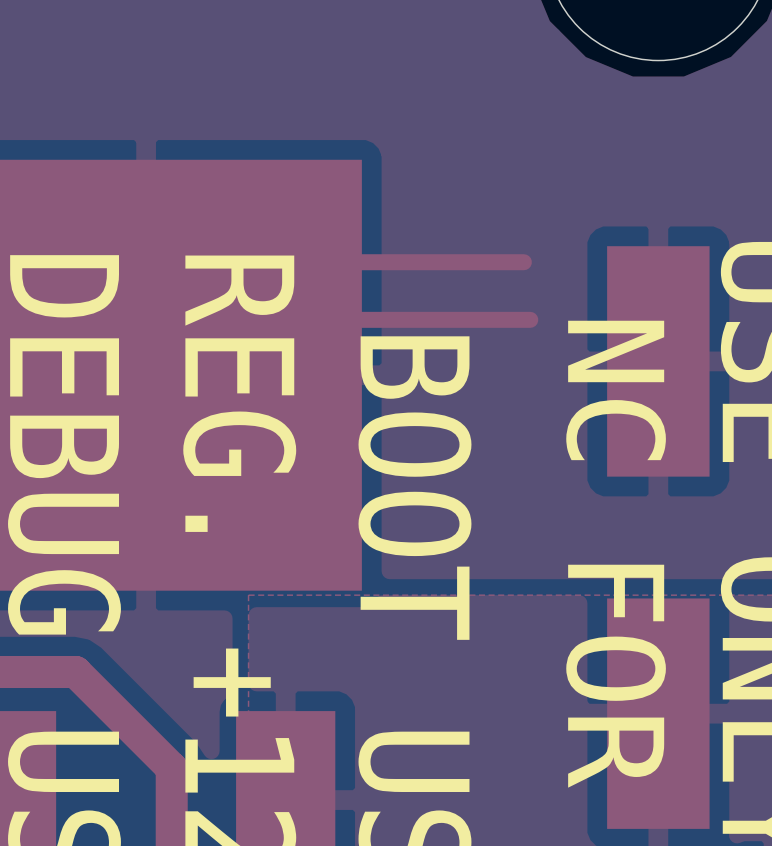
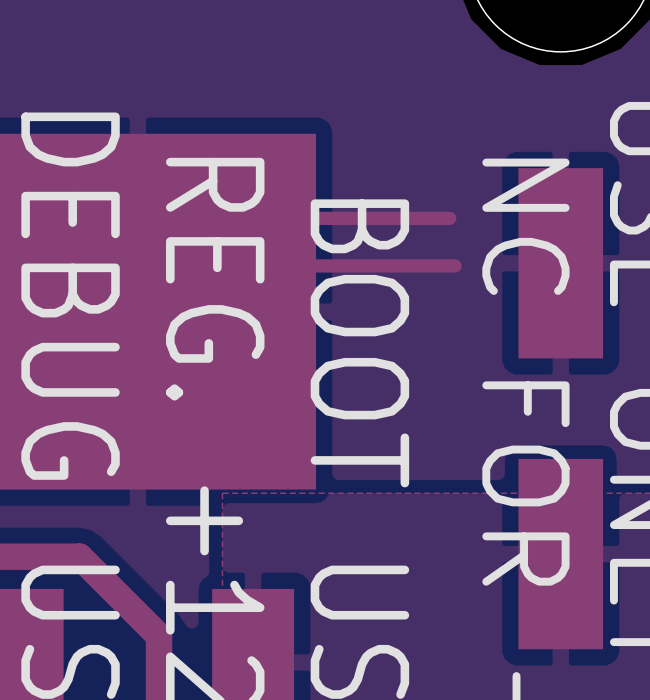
part position: (658, 537) -> (560, 408)

